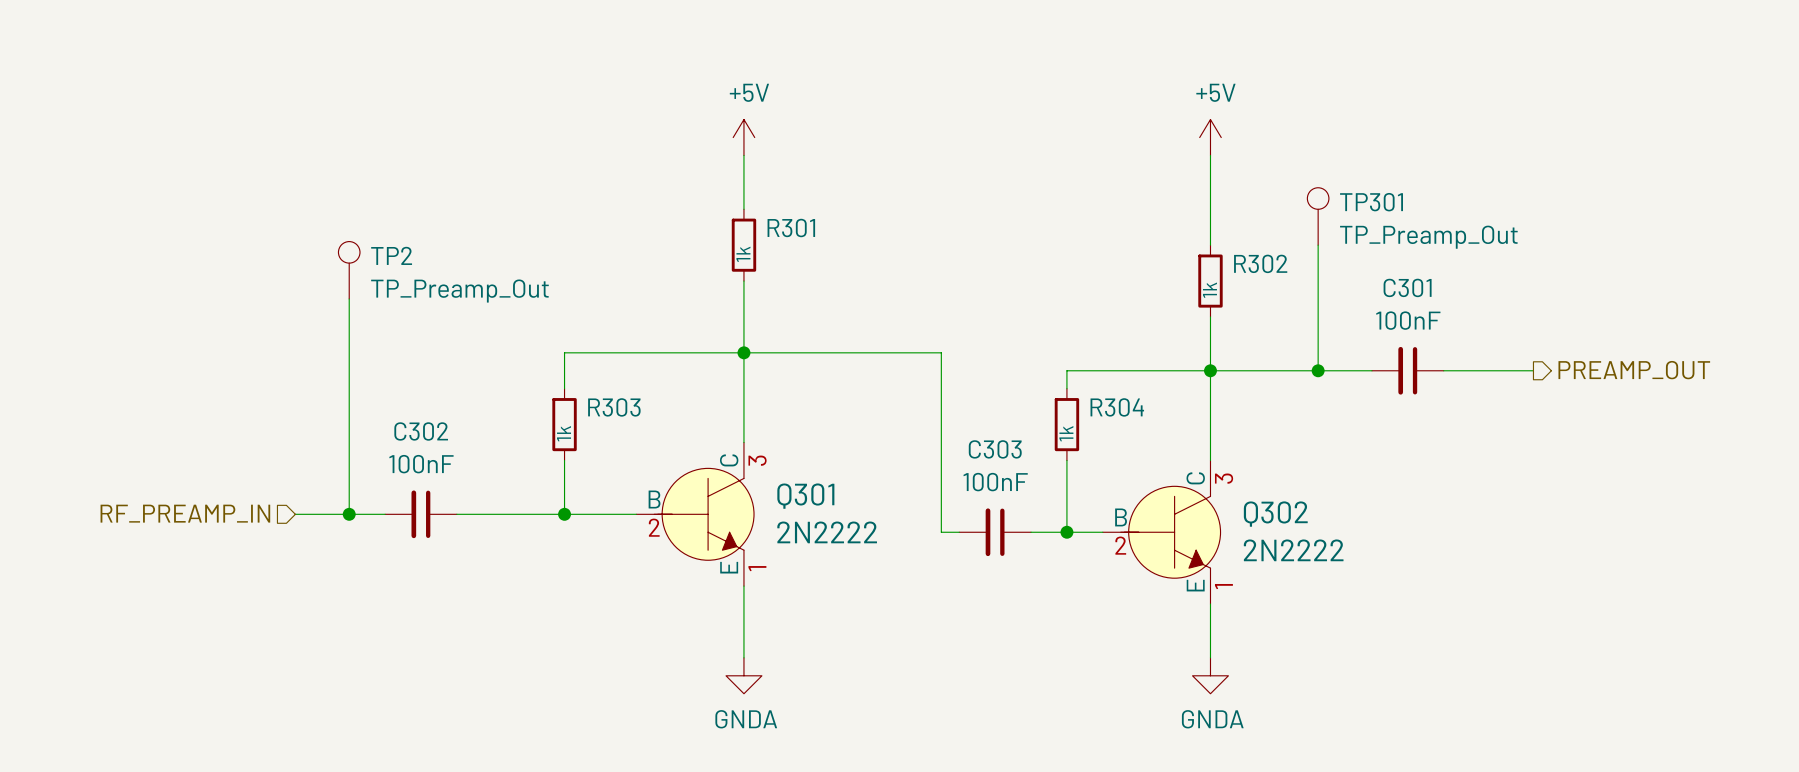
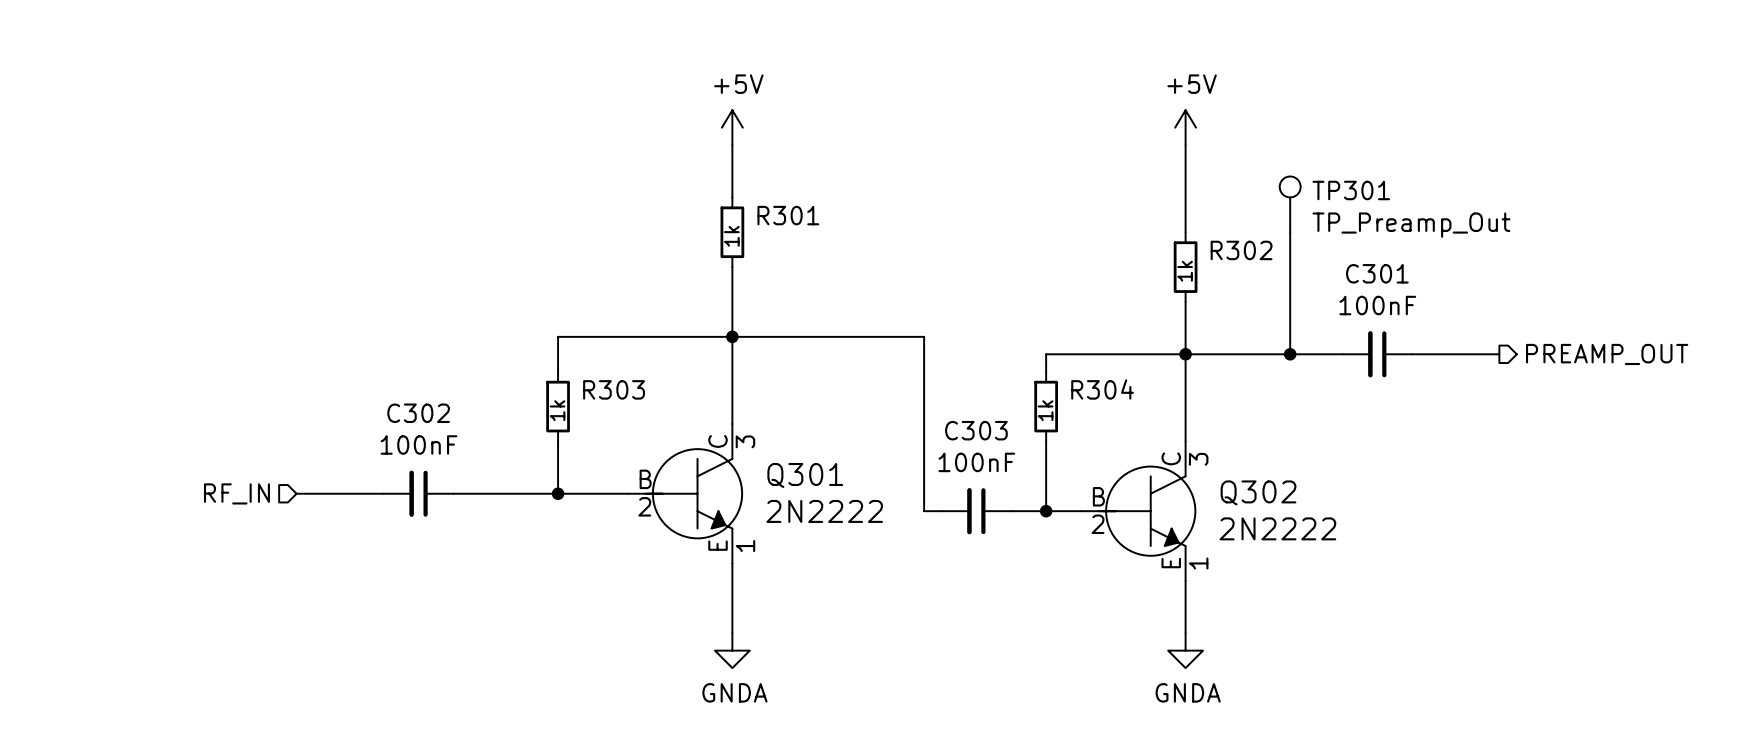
TP2: TP_Preamp_Out (349, 270) -> none
wire: (349, 299) (349, 514) -> none
hierarchical label: RF_PREAMP_IN (185, 513) -> RF_IN (236, 493)
junction: (349, 514) -> none

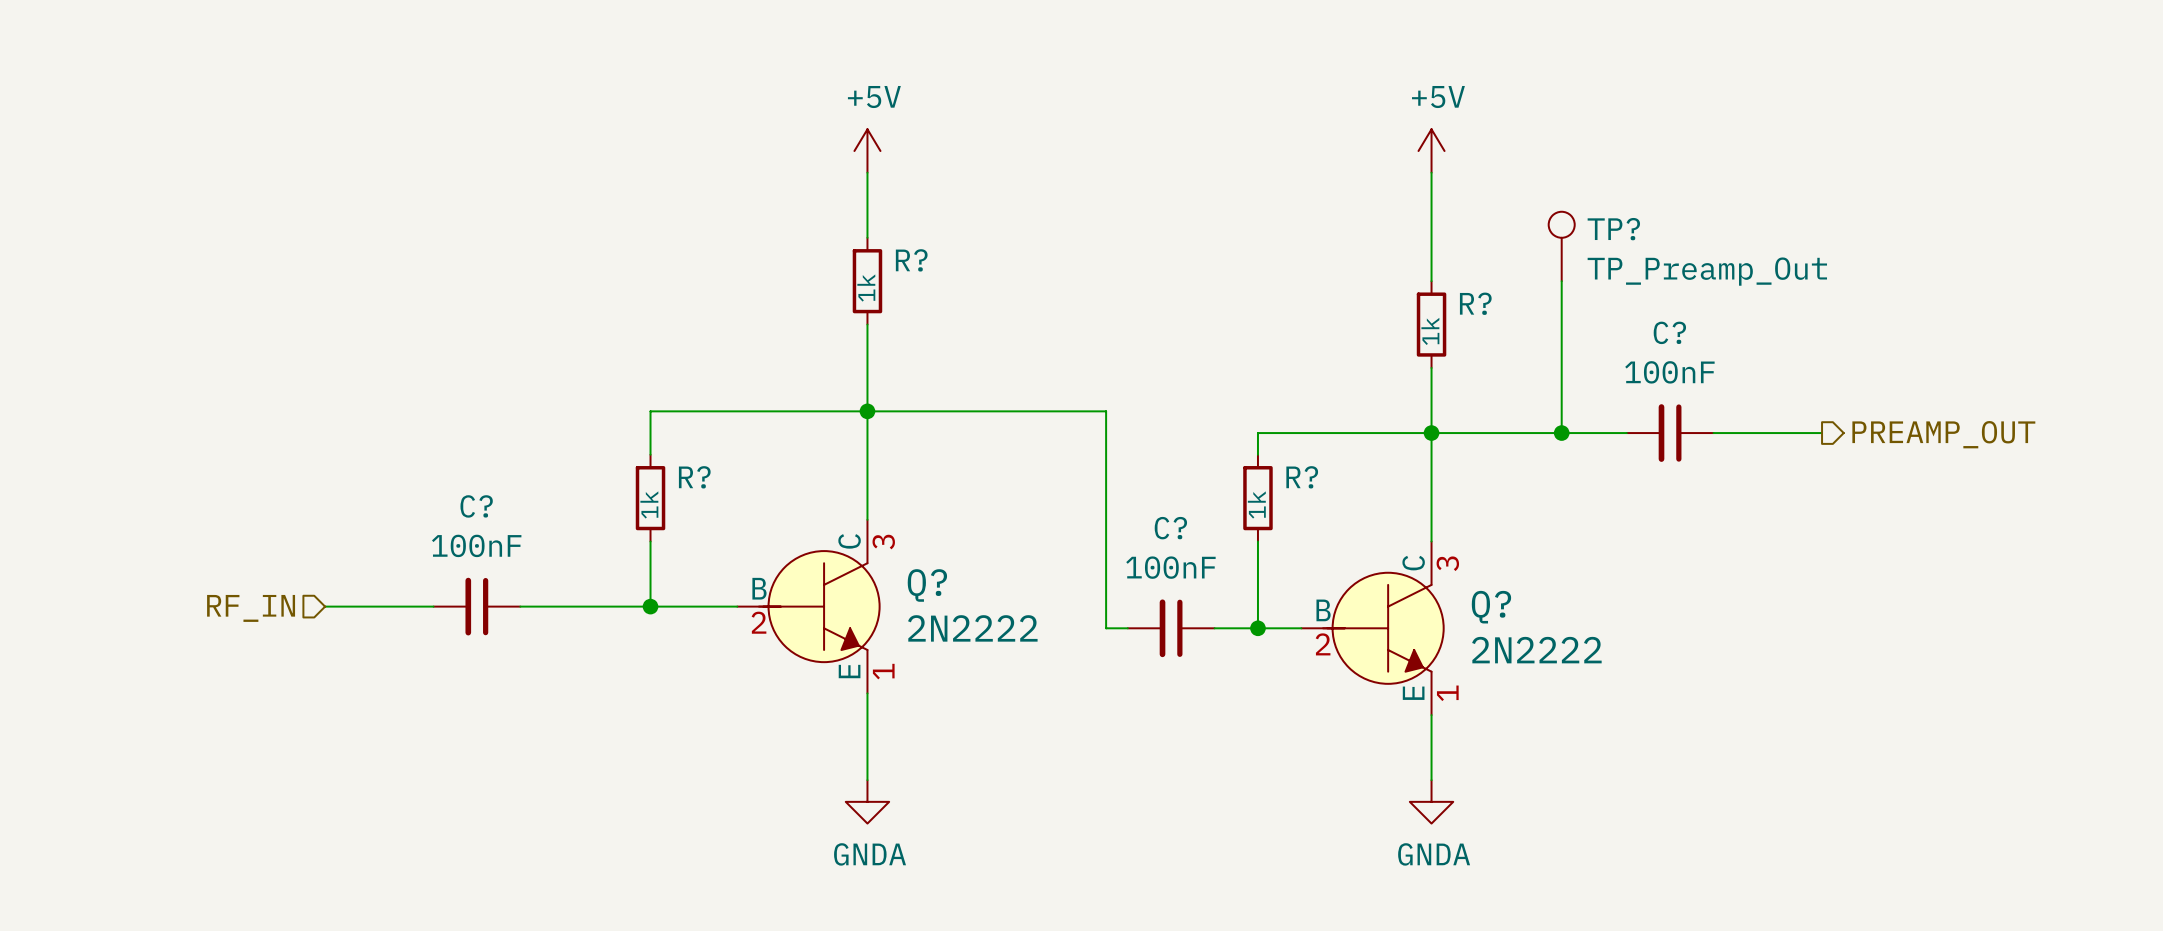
TP301 name: TP301 (1351, 190) -> TP? (1613, 229)
R301 name: R301 (788, 215) -> R? (911, 260)
R302 name: R302 (1241, 250) -> R? (1475, 303)
C301 name: C301 (1377, 273) -> C? (1669, 332)
R303 name: R303 (614, 389) -> R? (694, 477)
R304 name: R304 (1102, 389) -> R? (1302, 477)
C302 name: C302 (418, 413) -> C? (476, 506)
C303 name: C303 (976, 430) -> C? (1170, 528)
Q301 name: Q301 (805, 475) -> Q? (927, 585)
Q302 name: Q302 (1258, 492) -> Q? (1491, 607)

